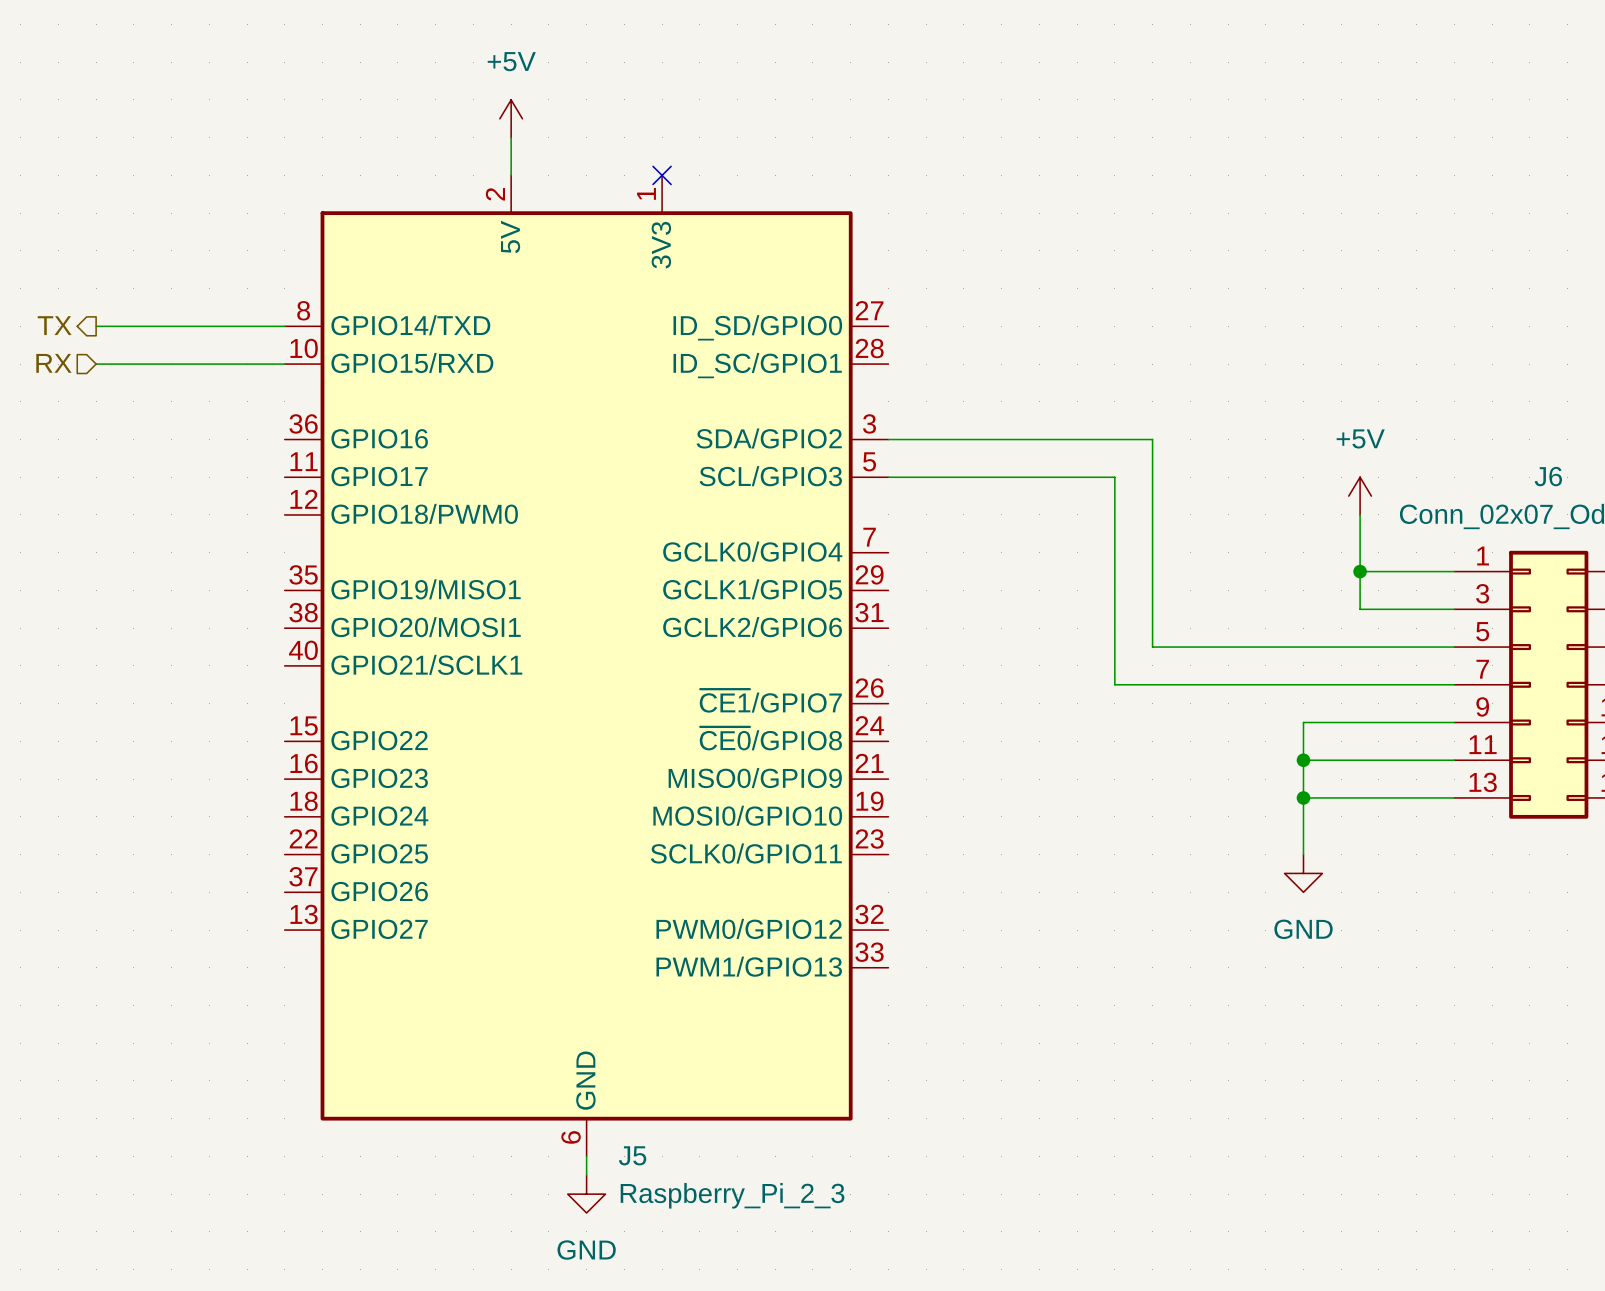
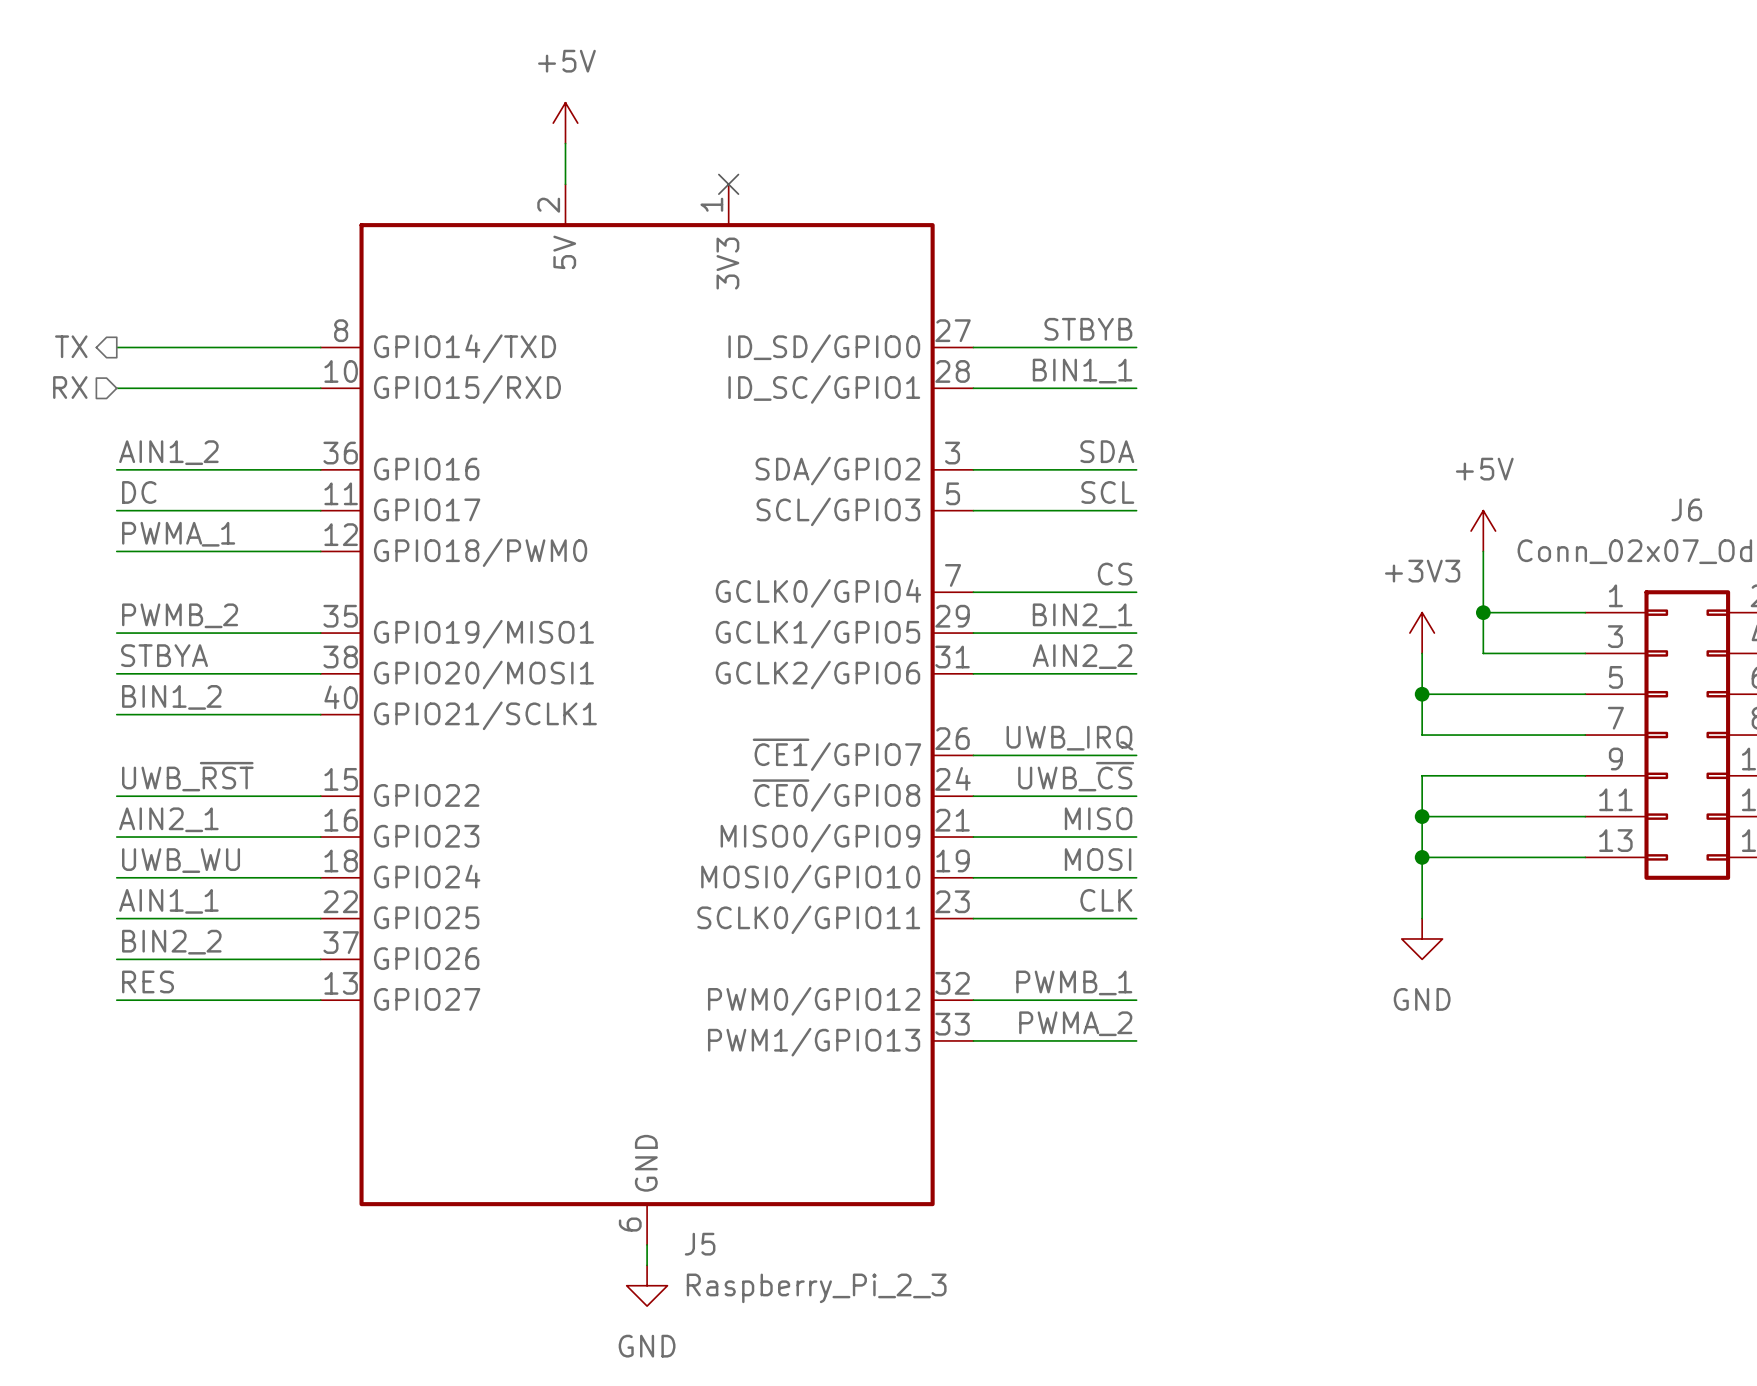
label: none -> STBYB (1088, 329)
wire: none -> (973, 347) (1136, 347)
label: none -> BIN1_1 (1082, 371)
wire: none -> (973, 388) (1136, 388)
label: none -> SDA (1107, 451)
label: none -> AIN1_2 (168, 452)
wire: none -> (116, 469) (320, 469)
wire: (1039, 439) (1152, 439) (1152, 647) (1303, 647) -> none
label: none -> DC (139, 492)
label: none -> SCL (1107, 492)
wire: none -> (116, 510) (320, 510)
wire: (1039, 477) (1114, 477) (1114, 684) (1303, 684) -> (1422, 653) (1422, 735)
label: none -> PWMA_1 (178, 534)
wire: none -> (116, 551) (320, 551)
label: none -> CS (1115, 574)
wire: none -> (973, 592) (1136, 592)
label: none -> PWMB_2 (180, 615)
label: none -> BIN2_1 (1082, 615)
wire: none -> (116, 633) (320, 633)
wire: none -> (973, 633) (1136, 633)
power symbol: none -> +3V3 (1422, 633)
label: none -> STBYA (164, 655)
label: none -> AIN2_2 (1082, 656)
wire: none -> (116, 673) (320, 673)
wire: none -> (973, 673) (1136, 673)
junction: none -> (1422, 694)
label: none -> BIN1_2 (171, 697)
wire: none -> (116, 714) (320, 714)
label: none -> UWB_IRQ (1069, 738)
wire: none -> (973, 755) (1136, 755)
label: none -> UWB_~{RST} (187, 776)
label: none -> UWB_~{CS} (1076, 776)
wire: none -> (116, 796) (320, 796)
wire: none -> (973, 796) (1136, 796)
label: none -> MISO (1098, 818)
label: none -> AIN2_1 (168, 819)
wire: none -> (116, 837) (320, 837)
wire: none -> (973, 837) (1136, 837)
label: none -> MOSI (1098, 859)
label: none -> UWB_WU (181, 860)
wire: none -> (116, 877) (320, 877)
wire: none -> (973, 877) (1136, 877)
label: none -> CLK (1106, 900)
label: none -> AIN1_1 (168, 901)
wire: none -> (116, 918) (320, 918)
wire: none -> (973, 918) (1136, 918)
label: none -> BIN2_2 (171, 942)
wire: none -> (116, 959) (320, 959)
label: none -> RES (148, 981)
label: none -> PWMB_1 (1074, 982)
wire: none -> (116, 1000) (320, 1000)
wire: none -> (973, 1000) (1136, 1000)
label: none -> PWMA_2 (1075, 1023)
wire: none -> (973, 1040) (1136, 1040)

